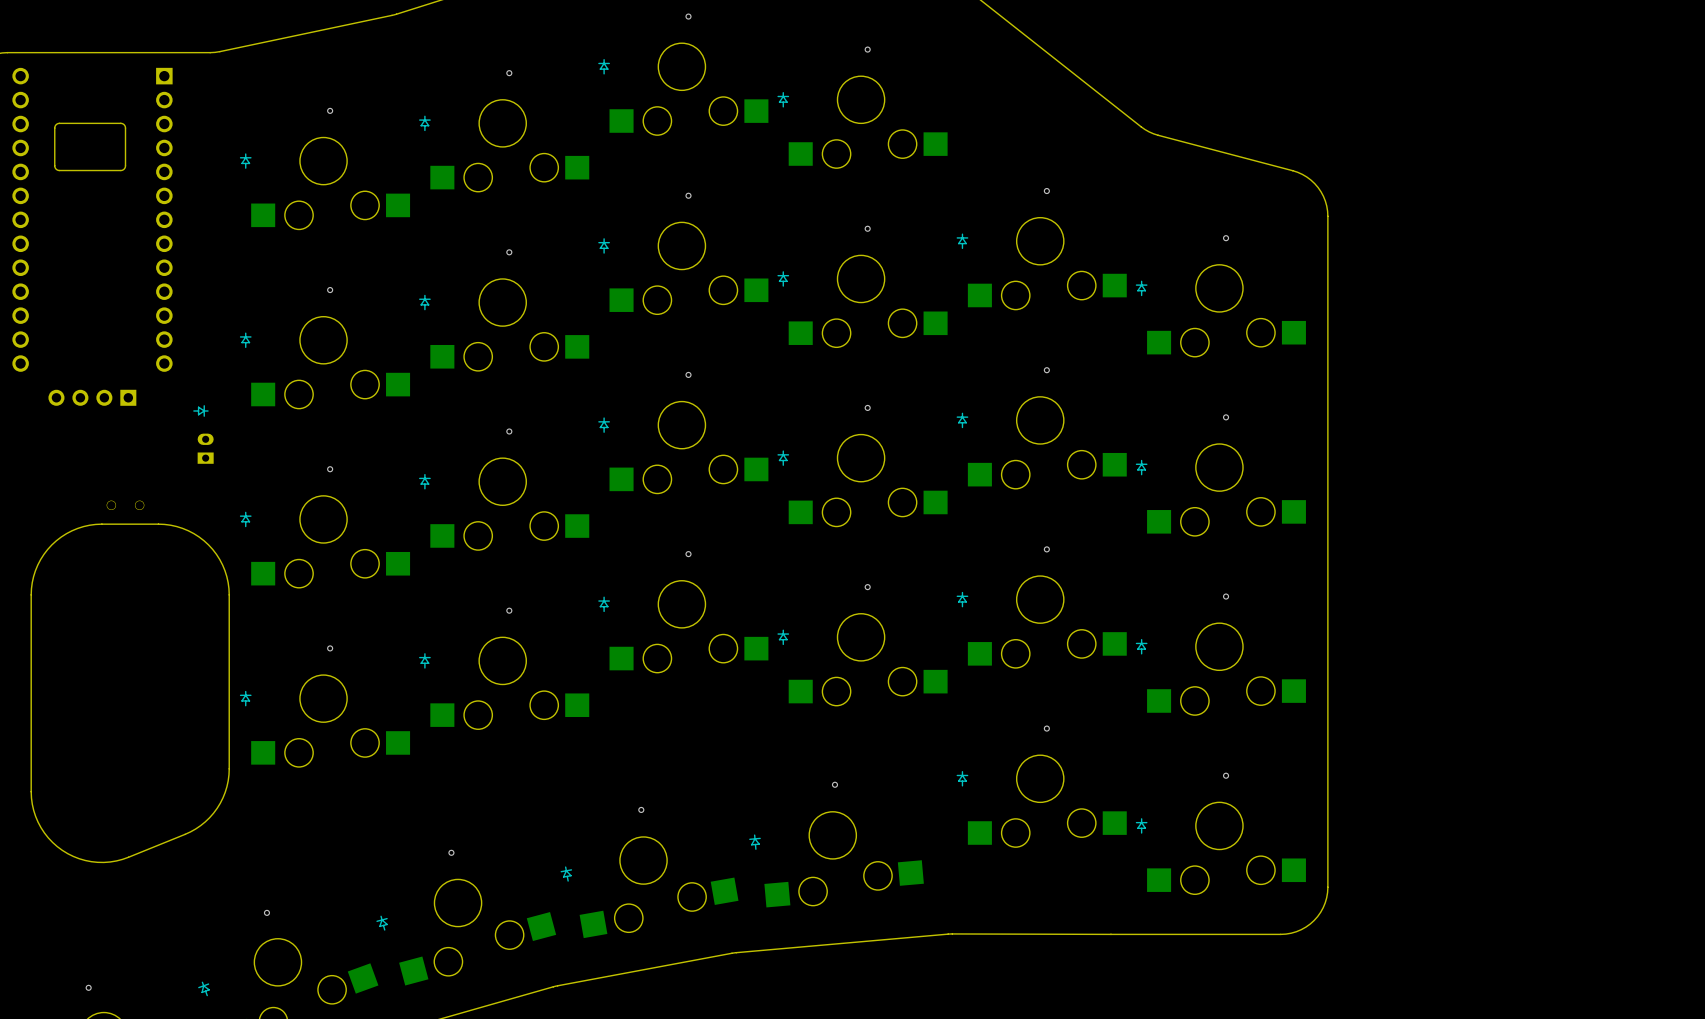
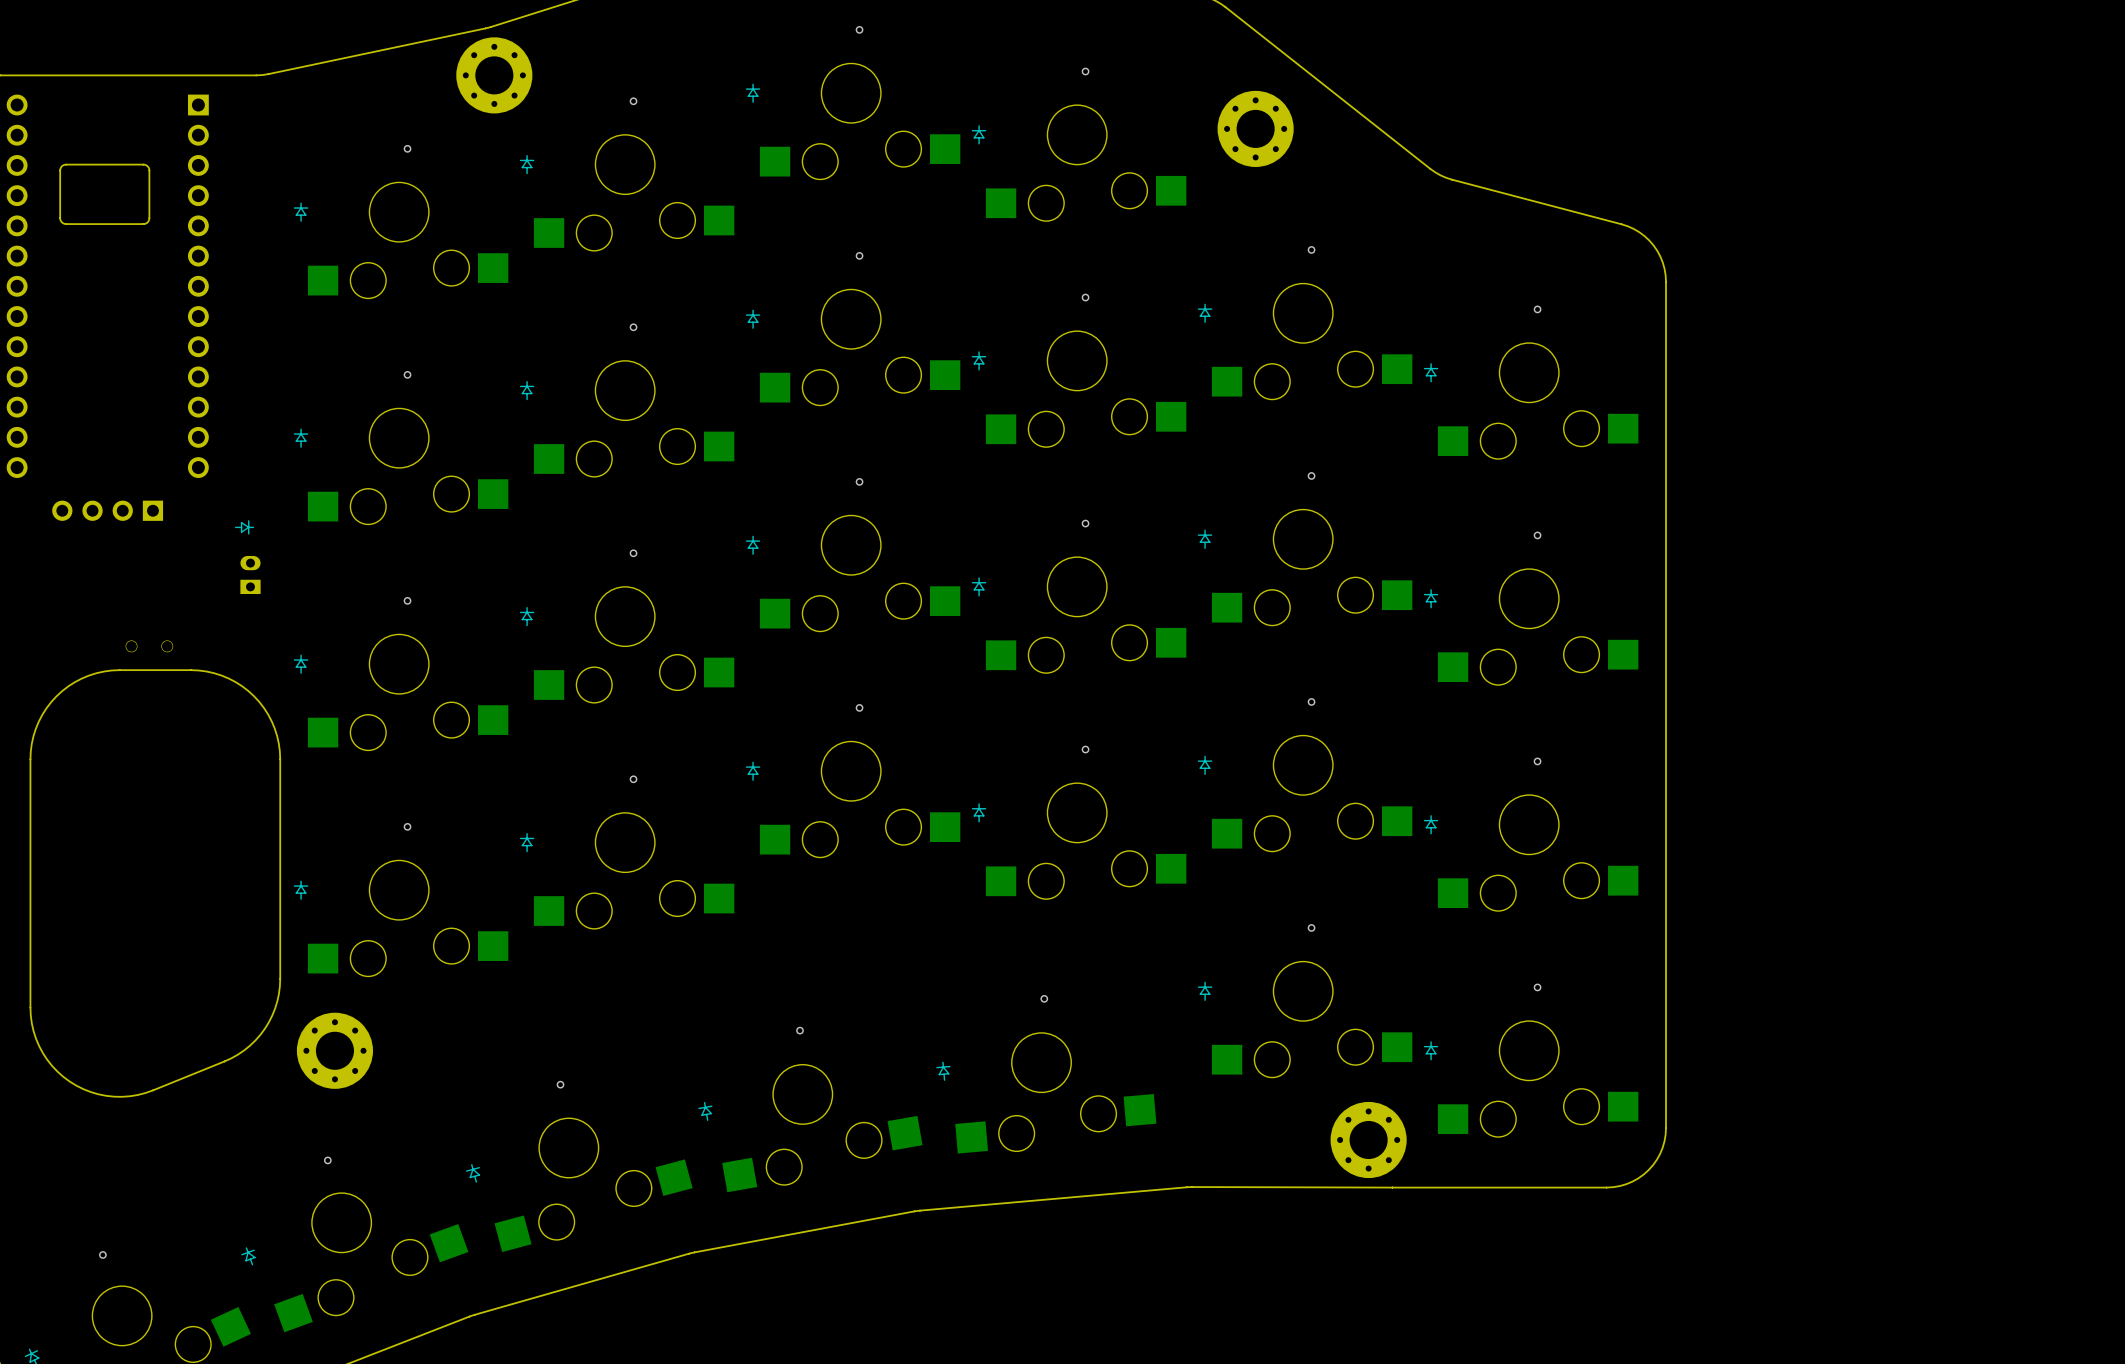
part: none -> (494, 75)
part: none -> (1255, 128)
part: none -> (334, 1050)
part: none -> (1368, 1140)

